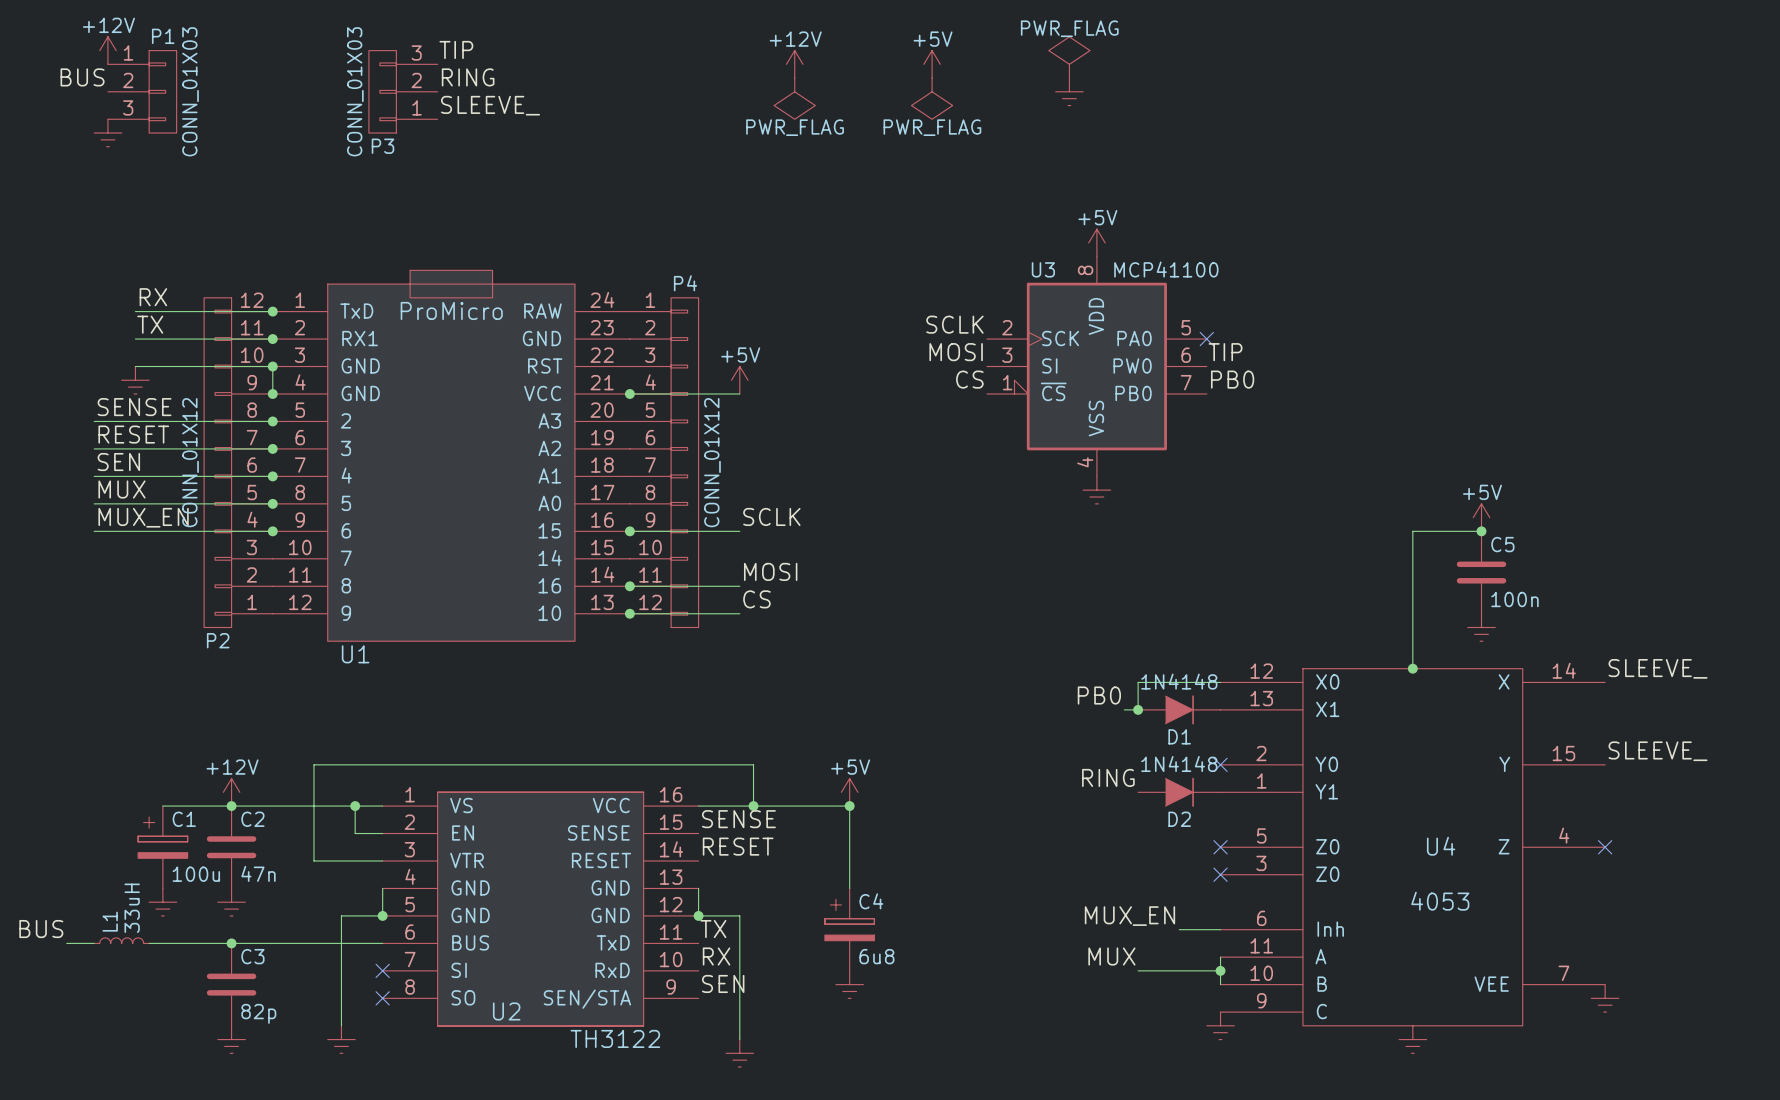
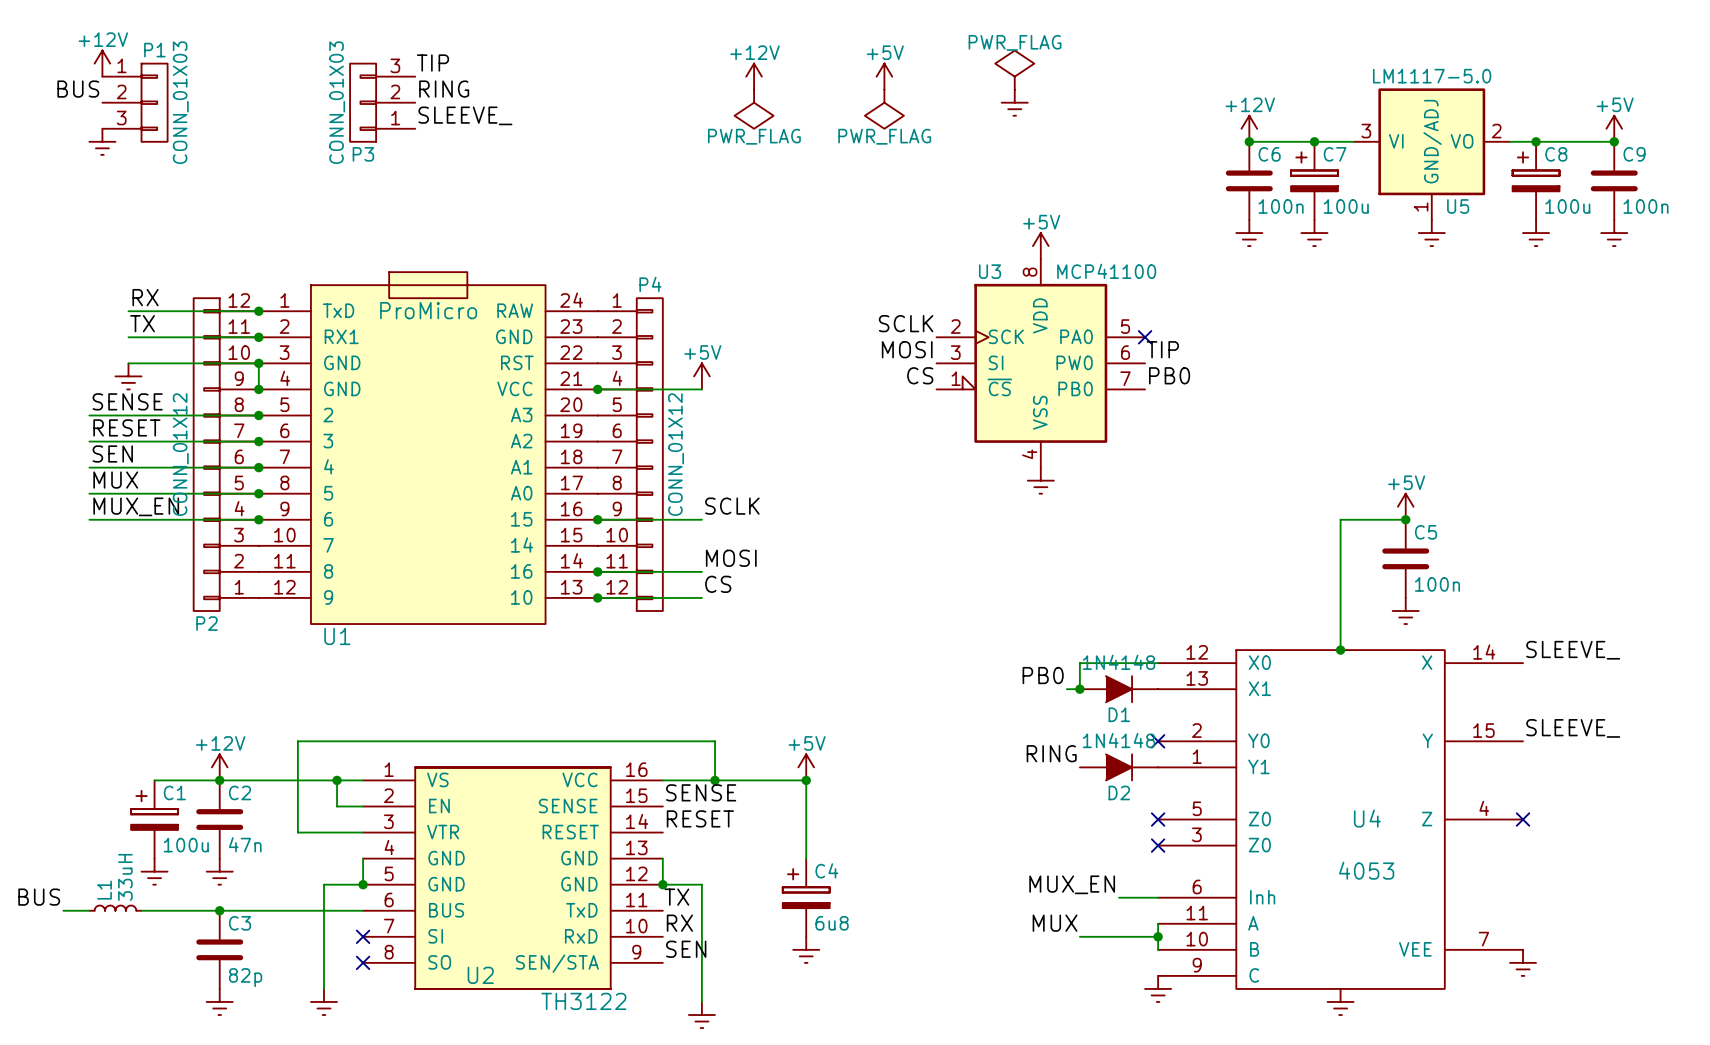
power symbol: none -> +12V (1249, 128)
power symbol: none -> +5V (1614, 128)
wire: none -> (1249, 141) (1353, 141)
junction: none -> (1249, 141)
junction: none -> (1314, 141)
wire: none -> (1509, 141) (1614, 141)
junction: none -> (1536, 141)
junction: none -> (1614, 141)
U5: none -> LM1117-5.0 (1431, 154)
C6: none -> 100n (1249, 180)
C7: none -> 100u (1314, 180)
C8: none -> 100u (1536, 180)
C9: none -> 100n (1614, 180)
power symbol: none -> (1249, 233)
power symbol: none -> (1314, 233)
power symbol: none -> (1431, 233)
power symbol: none -> (1536, 233)
power symbol: none -> (1614, 233)

